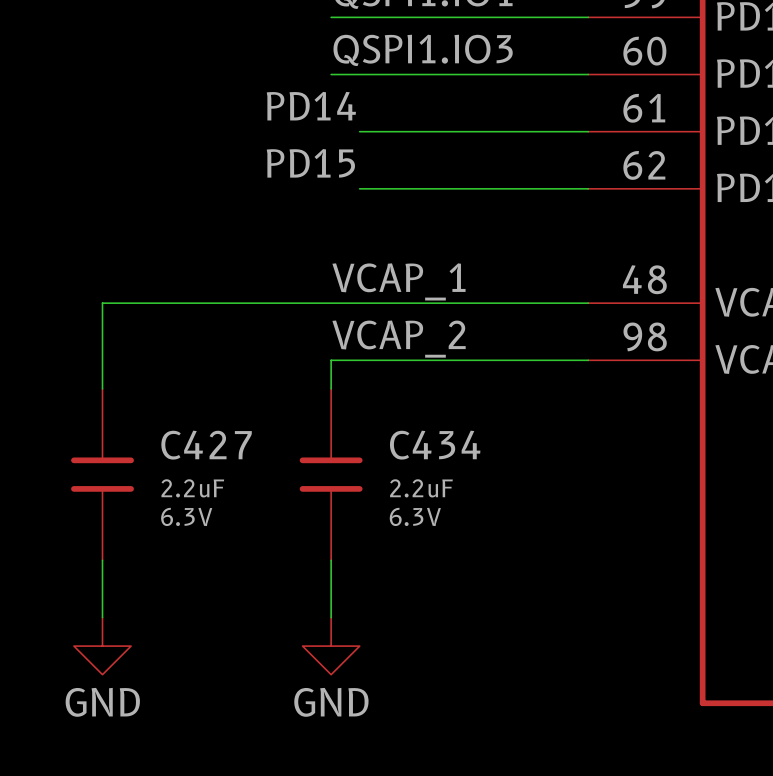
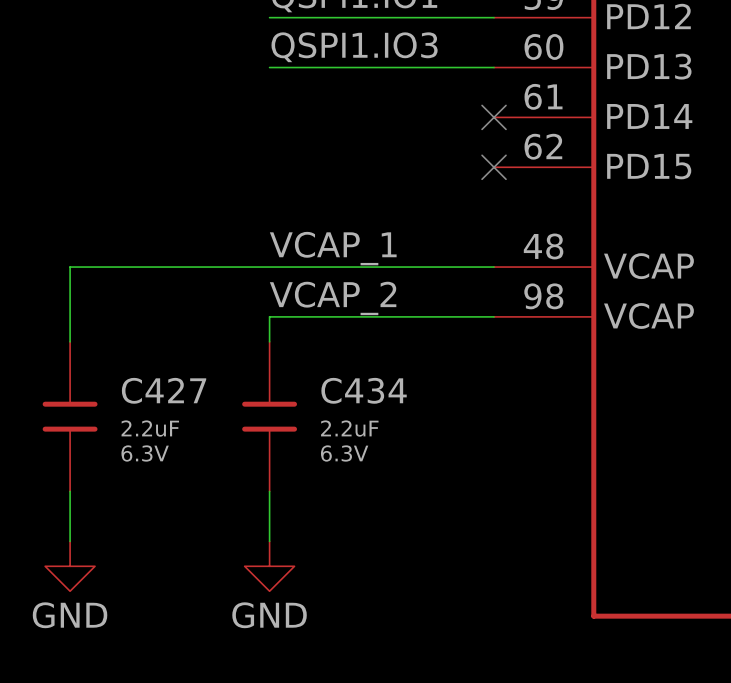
label: PD14 (311, 106) -> none
wire: (359, 131) (588, 131) -> none
no-connect mark: none -> (494, 117)
label: PD15 (310, 163) -> none
wire: (359, 188) (588, 188) -> none
no-connect mark: none -> (494, 167)

